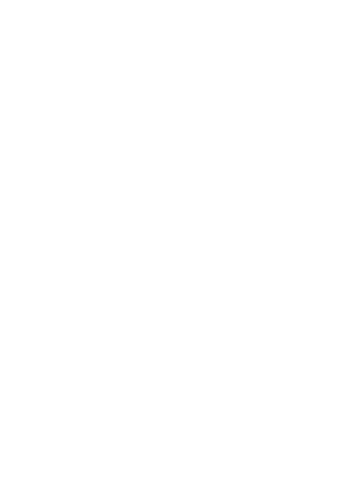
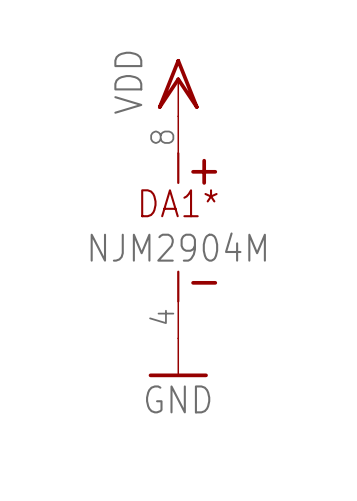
power symbol: none -> VDD (178, 87)
DA1*: none -> NJM2904M (197, 227)
power symbol: none -> GND (178, 357)

